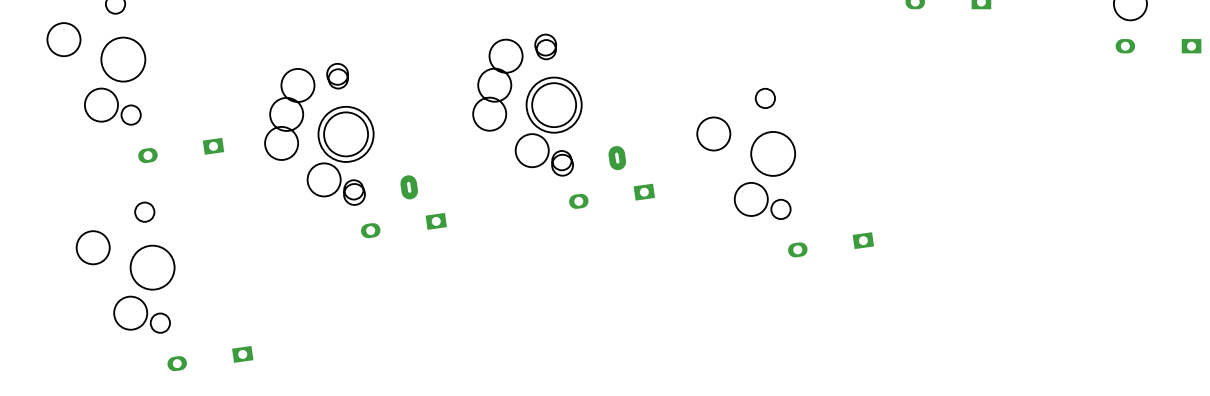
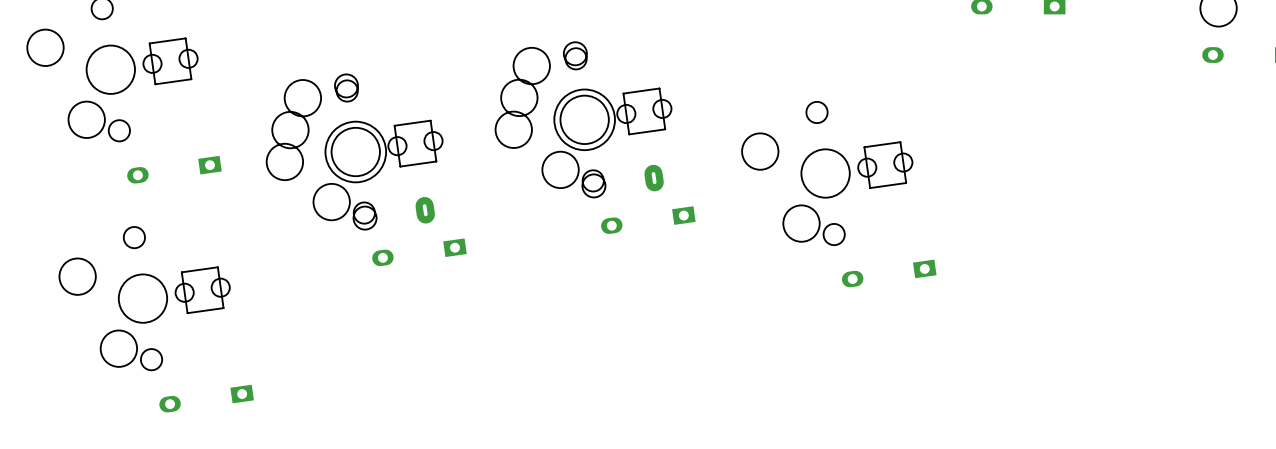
part: none -> (170, 61)
part: none -> (644, 111)
part: none -> (415, 143)
part: none -> (885, 165)
part: none -> (202, 290)

